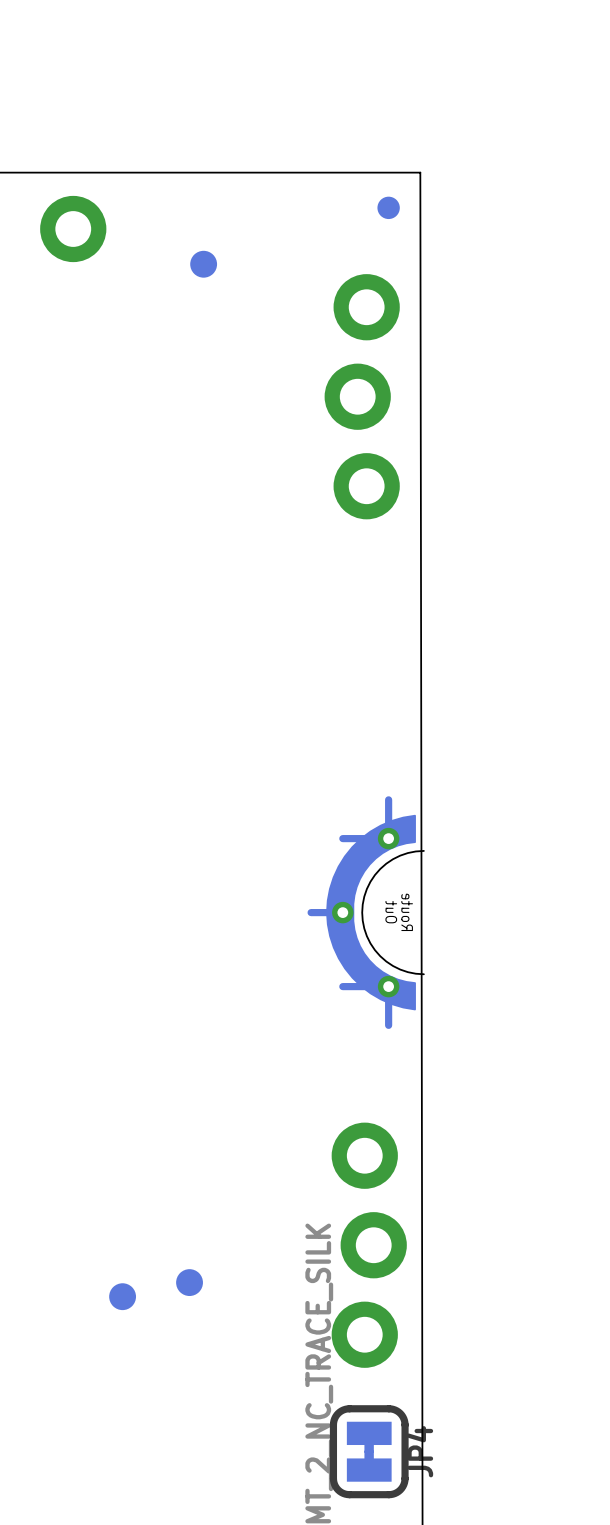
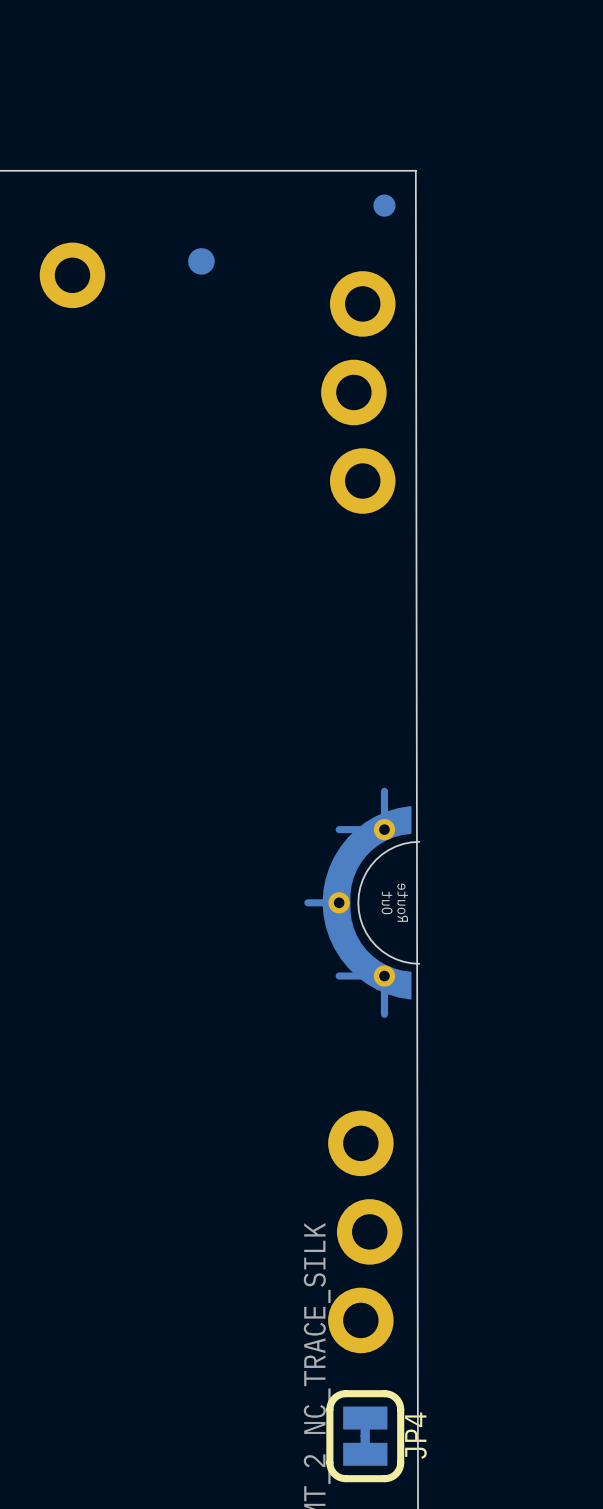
part position: (73, 229) -> (72, 275)
part: (189, 1282) -> none
part: (122, 1296) -> none

